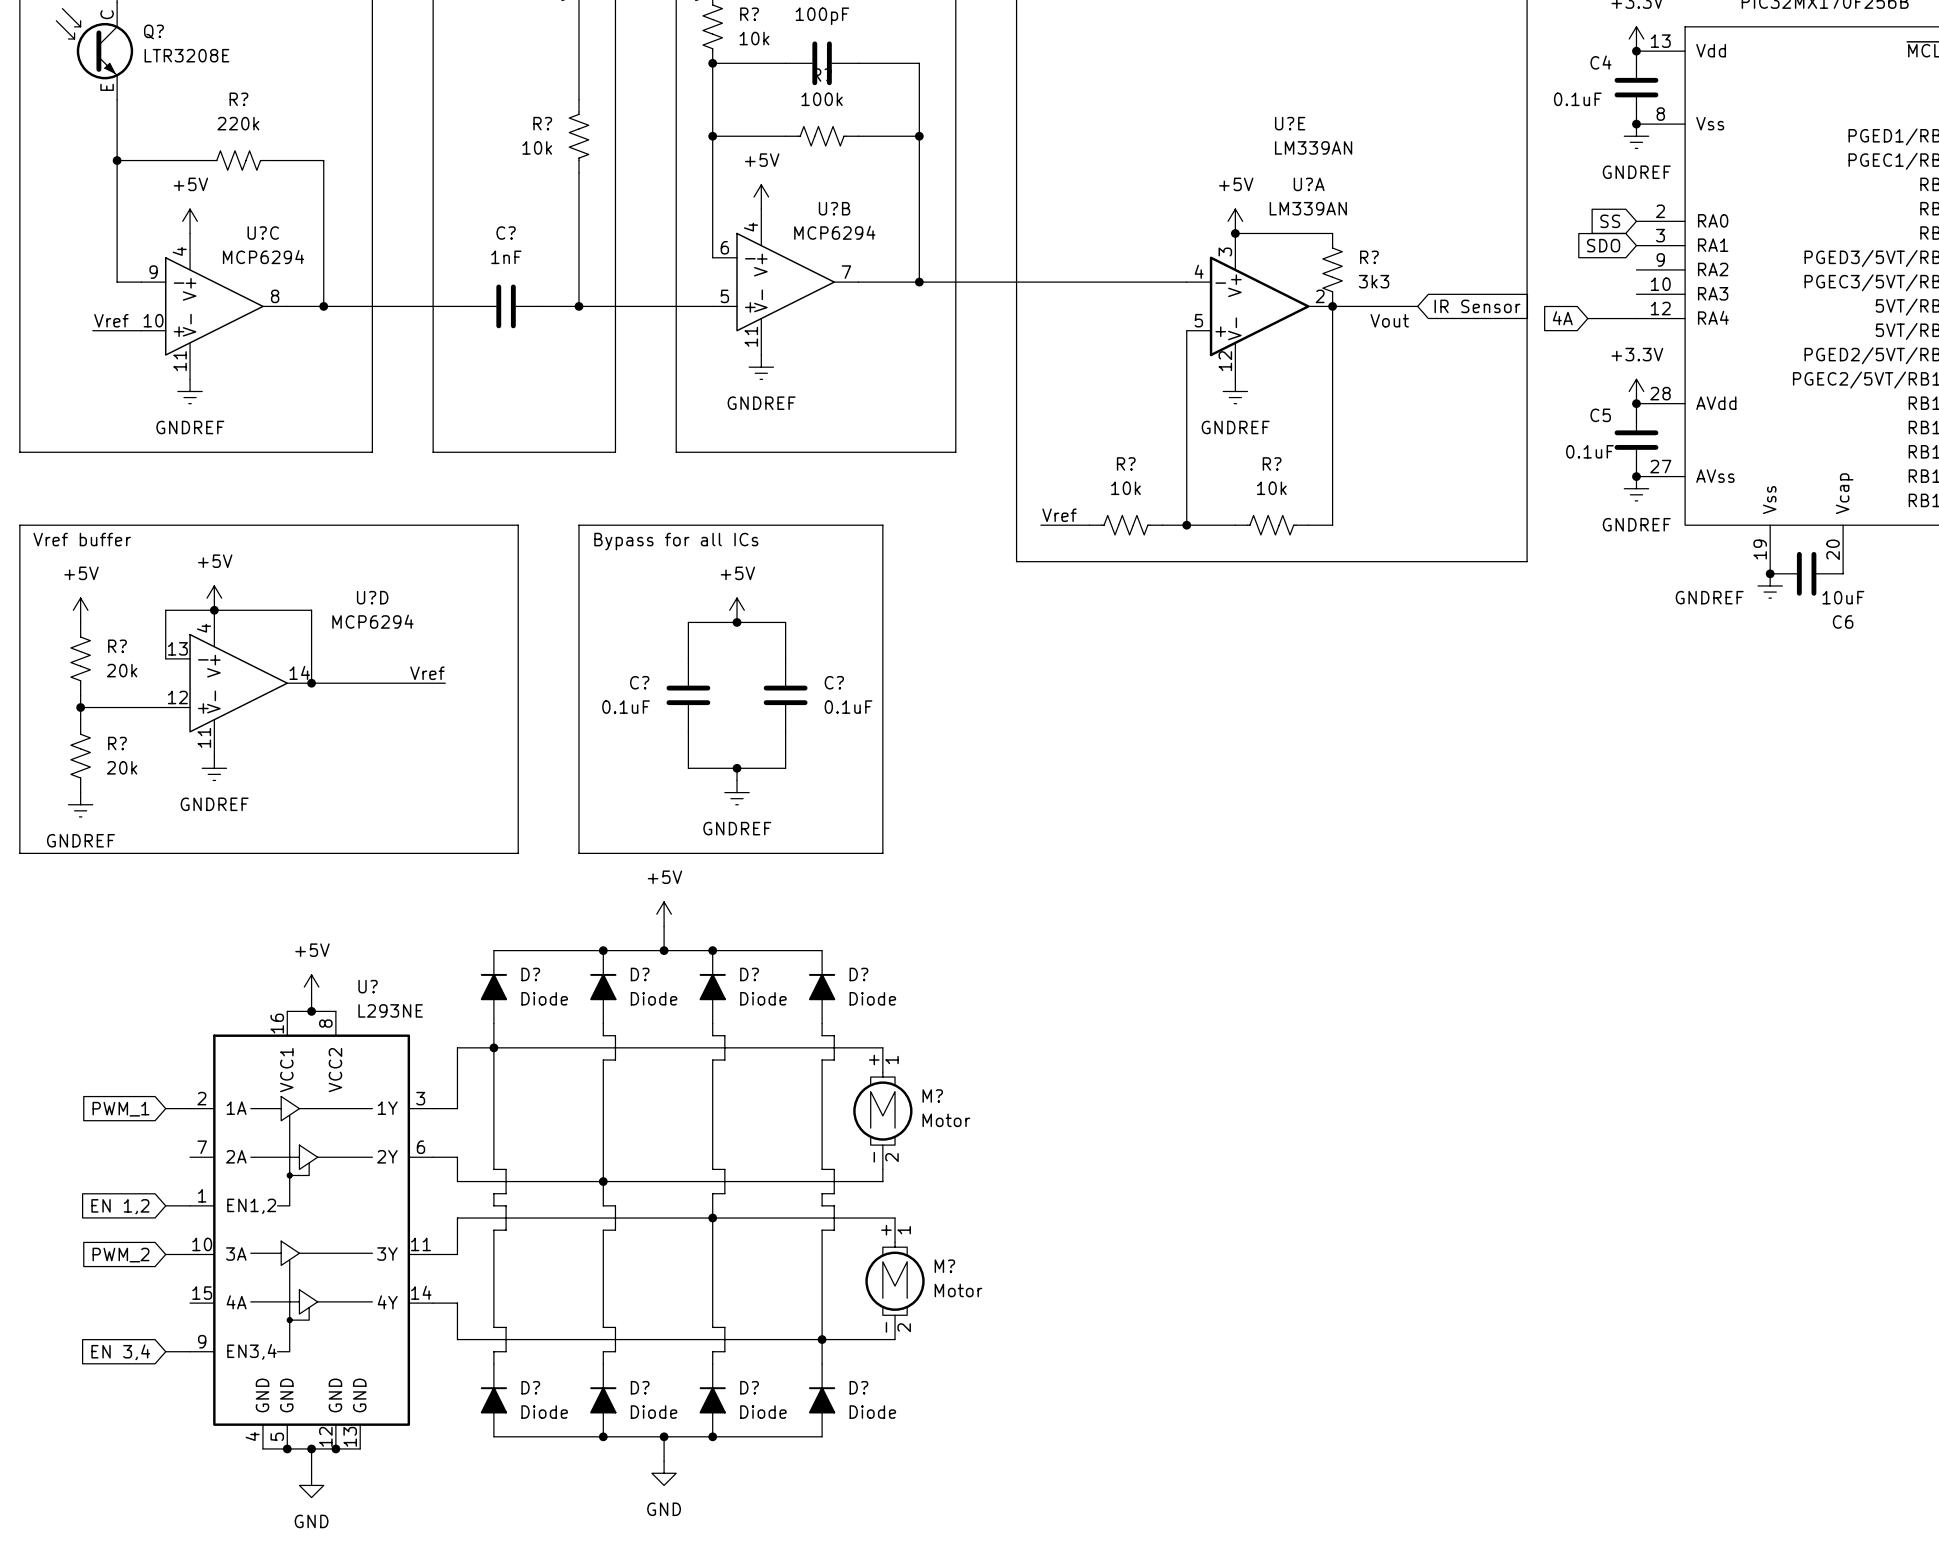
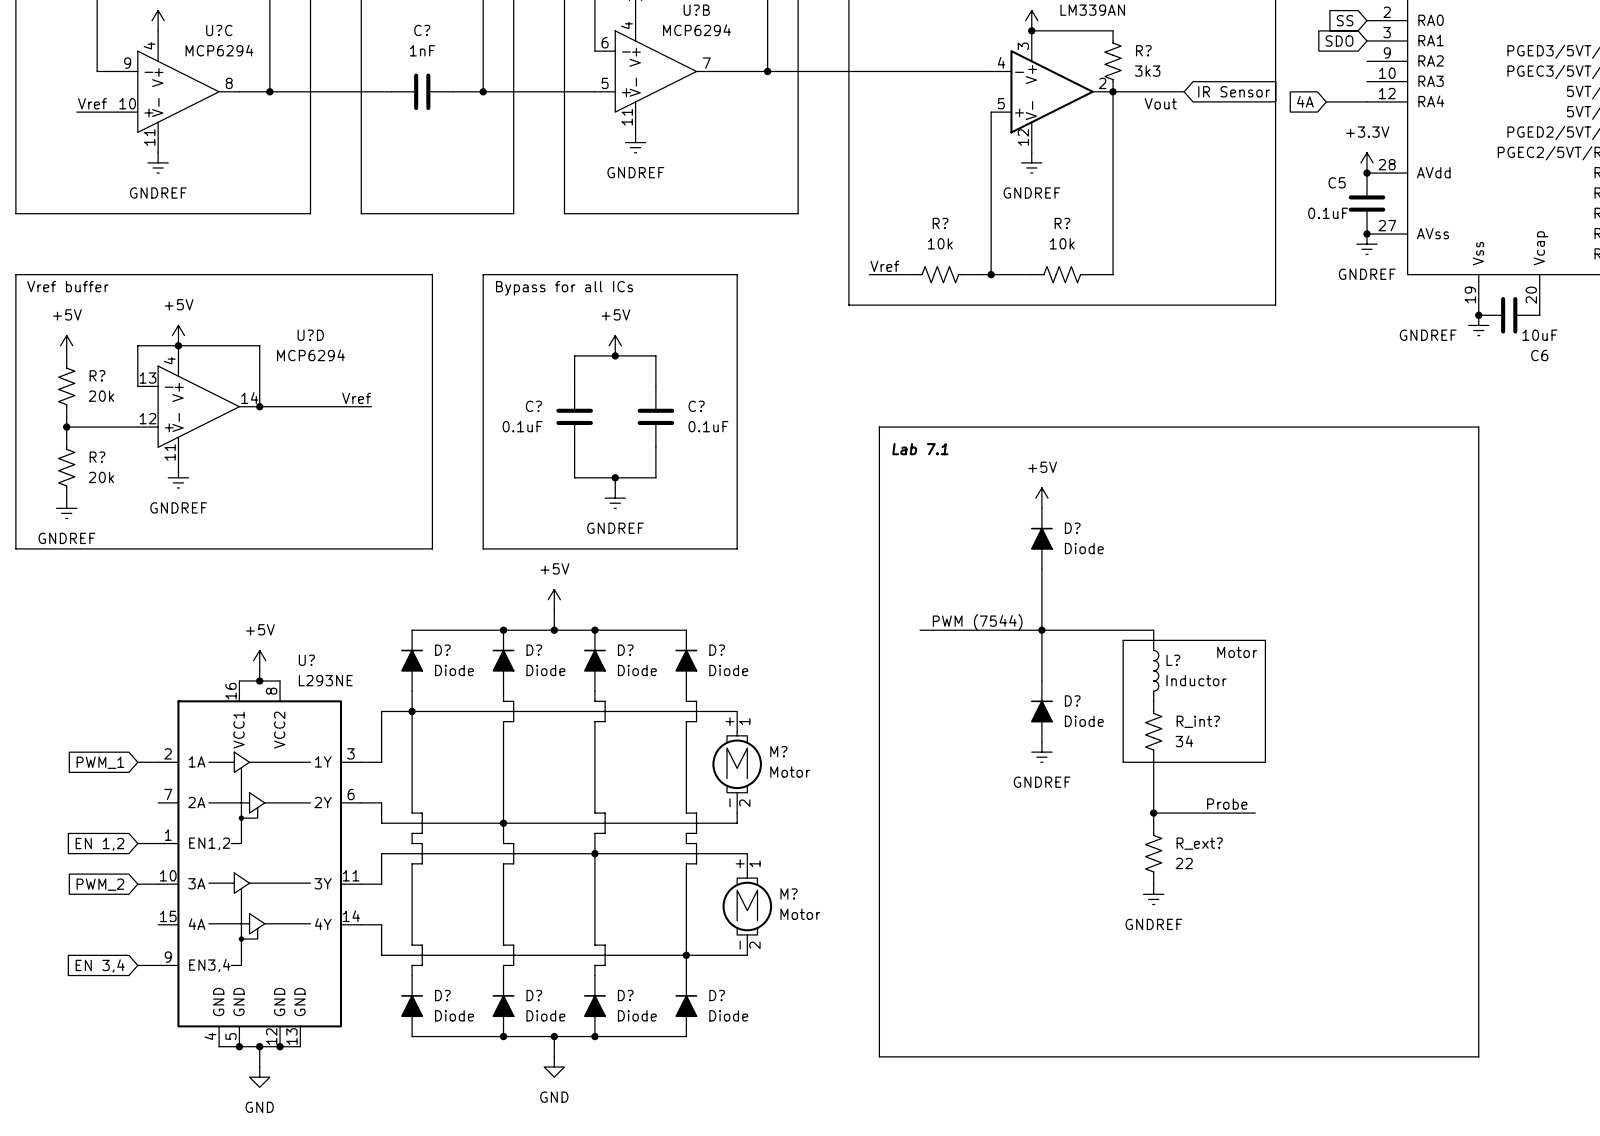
line: none -> (879, 427) (879, 1056) (1478, 1056) (1478, 427) (879, 427)
text: none -> Lab 7.1 (920, 449)
power symbol: none -> +5V (1041, 498)
D?: none -> Diode (1041, 538)
wire: none -> (1041, 569) (1041, 681)
label: none -> PWM (7544) (977, 622)
wire: none -> (920, 630) (1153, 630) (1153, 640)
junction: none -> (1041, 630)
line: none -> (1123, 640) (1123, 762) (1265, 762) (1265, 640) (1123, 640)
text: none -> Motor (1237, 652)
L?: none -> Inductor (1156, 670)
D?: none -> Diode (1041, 711)
R_int?: none -> 34 (1153, 731)
power symbol: none -> GNDREF (1041, 752)
wire: none -> (1153, 762) (1153, 823)
label: none -> Probe (1227, 803)
wire: none -> (1153, 813) (1255, 813)
junction: none -> (1153, 813)
R_ext?: none -> 22 (1153, 853)
power symbol: none -> GNDREF (1153, 894)

